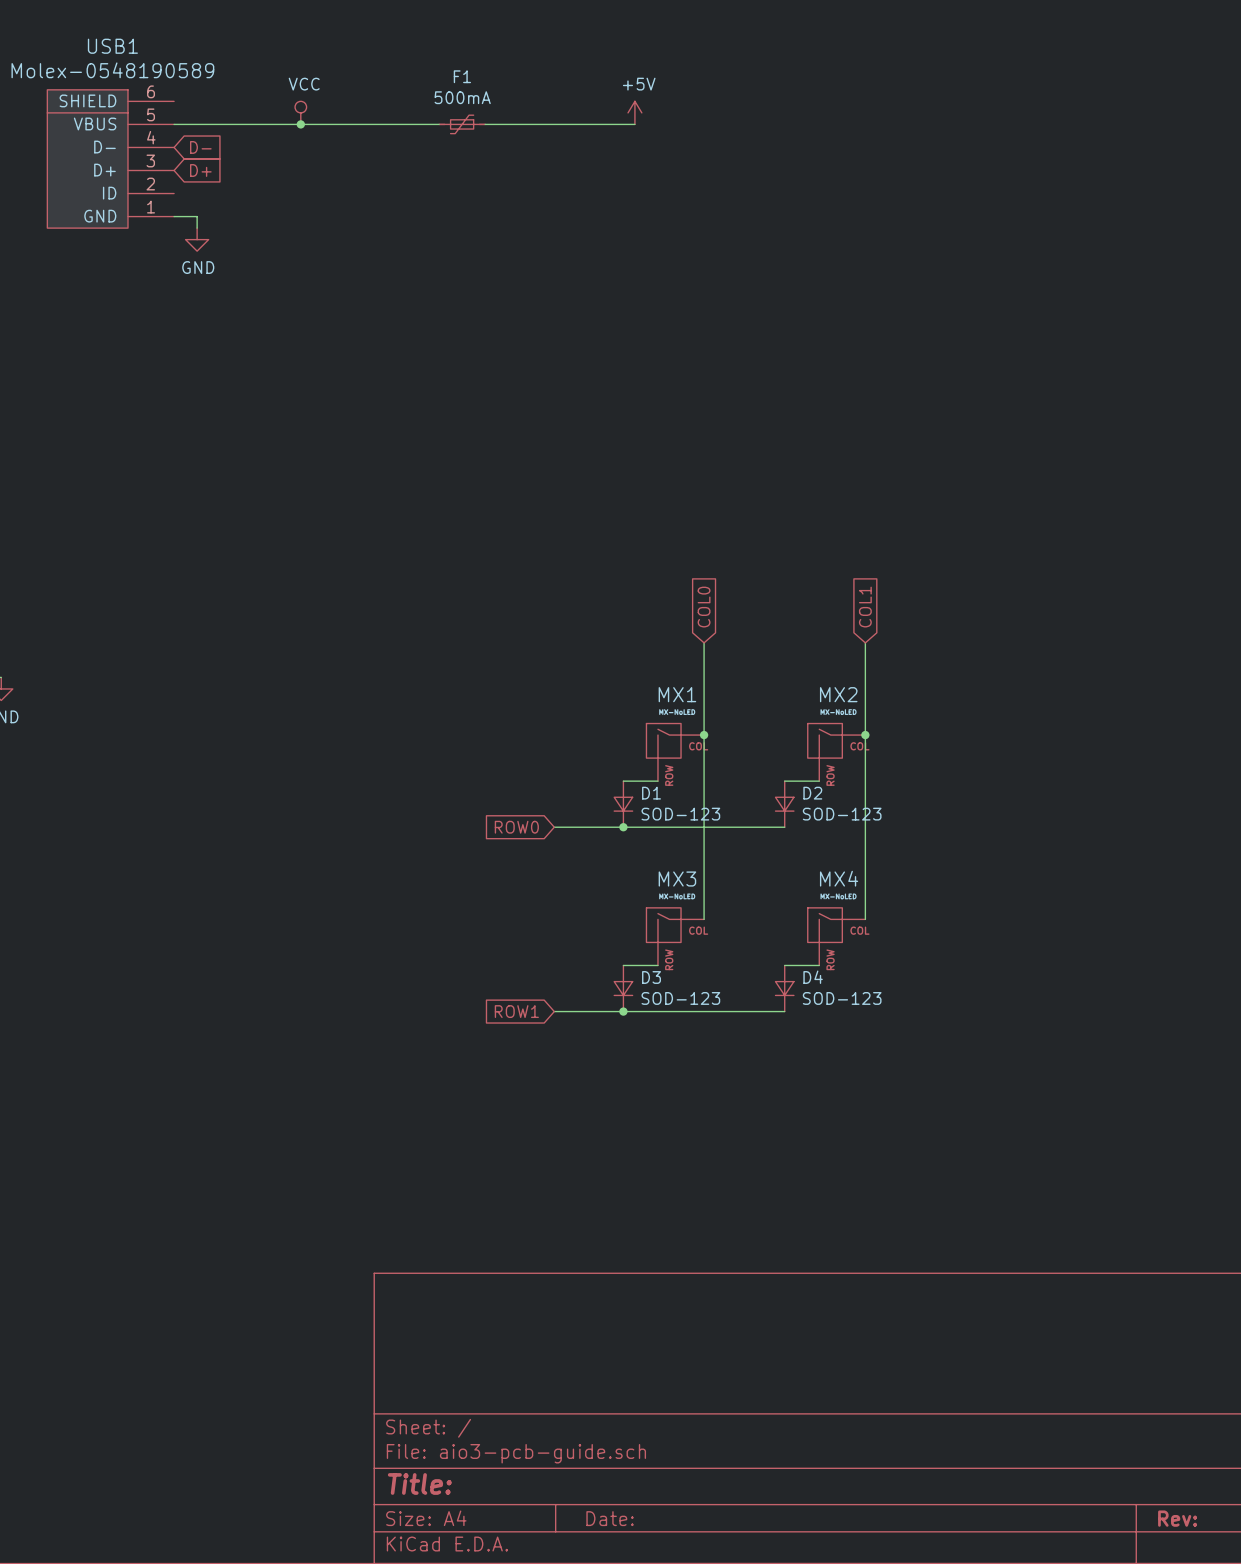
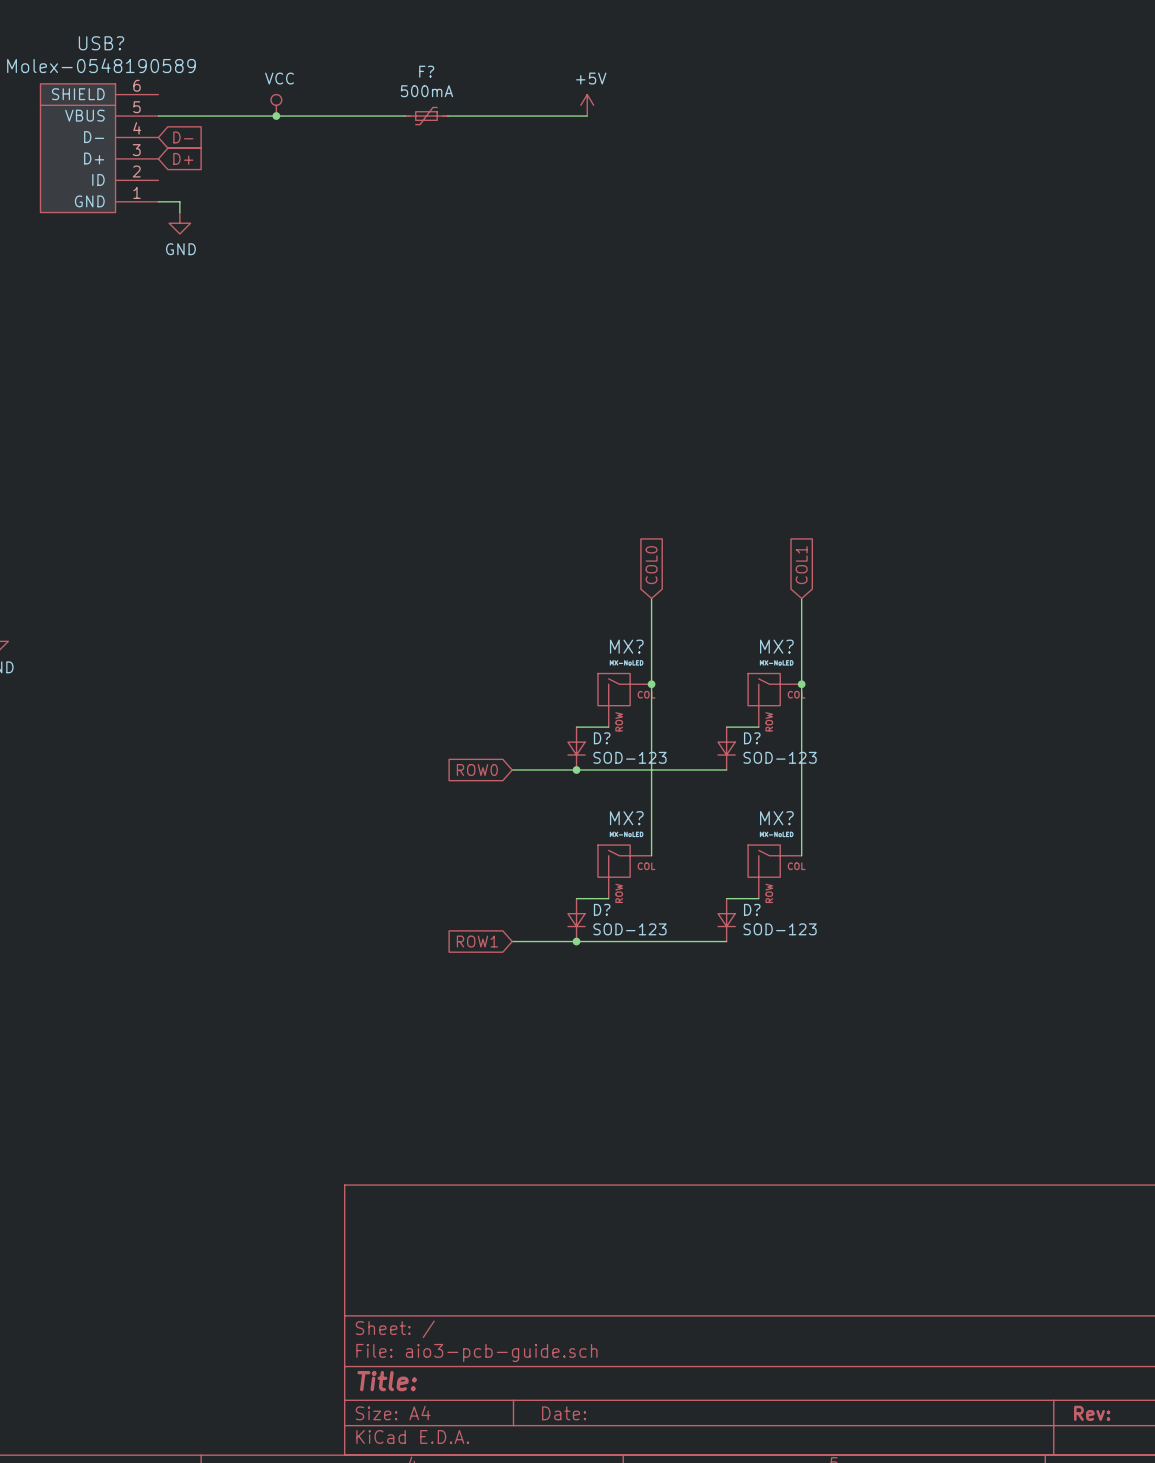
USB1 name: USB1 (112, 46) -> USB? (101, 43)
F1 name: F1 (462, 76) -> F? (426, 71)
MX1 name: MX1 (677, 694) -> MX? (626, 646)
MX2 name: MX2 (838, 694) -> MX? (776, 646)
D1 name: D1 (651, 793) -> D? (602, 738)
D2 name: D2 (812, 793) -> D? (752, 738)
MX4 name: MX4 (839, 878) -> MX? (776, 818)
MX3 name: MX3 (677, 879) -> MX? (626, 818)
D3 name: D3 (651, 977) -> D? (602, 909)
D4 name: D4 (813, 977) -> D? (752, 909)

